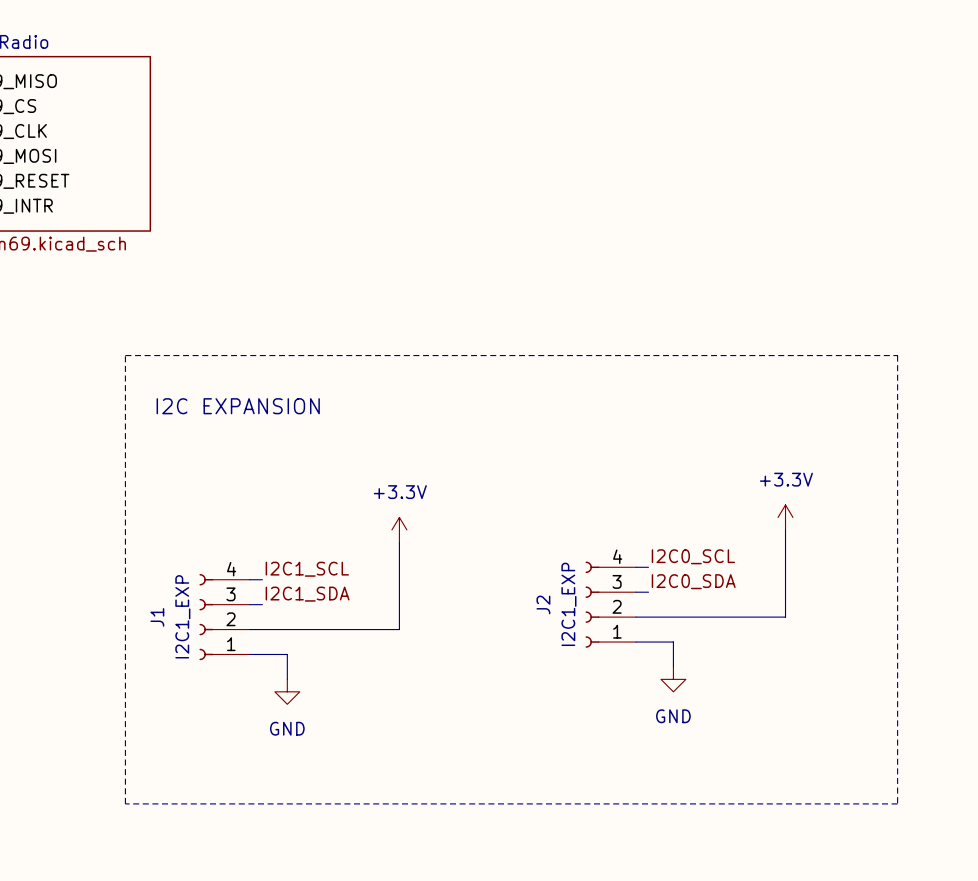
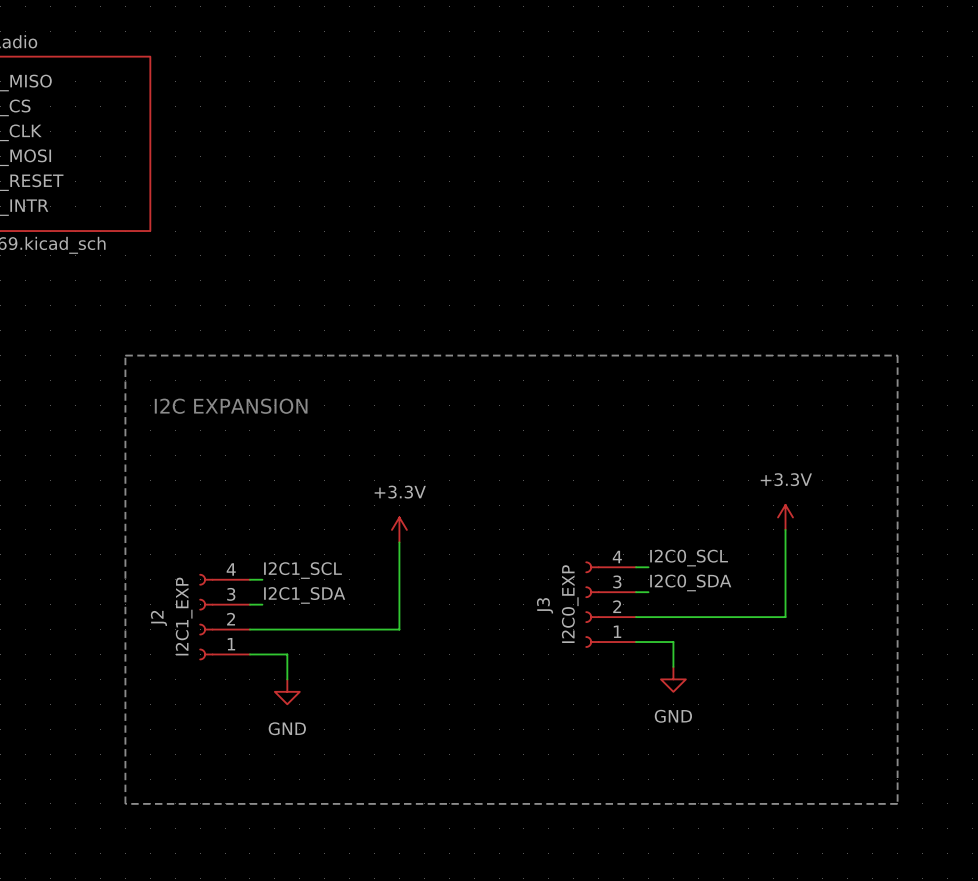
J2 name: J2 (543, 604) -> J3 (545, 605)
J2 value: I2C1_EXP (568, 604) -> I2C0_EXP (570, 604)
J1 name: J1 (157, 617) -> J2 (158, 618)

